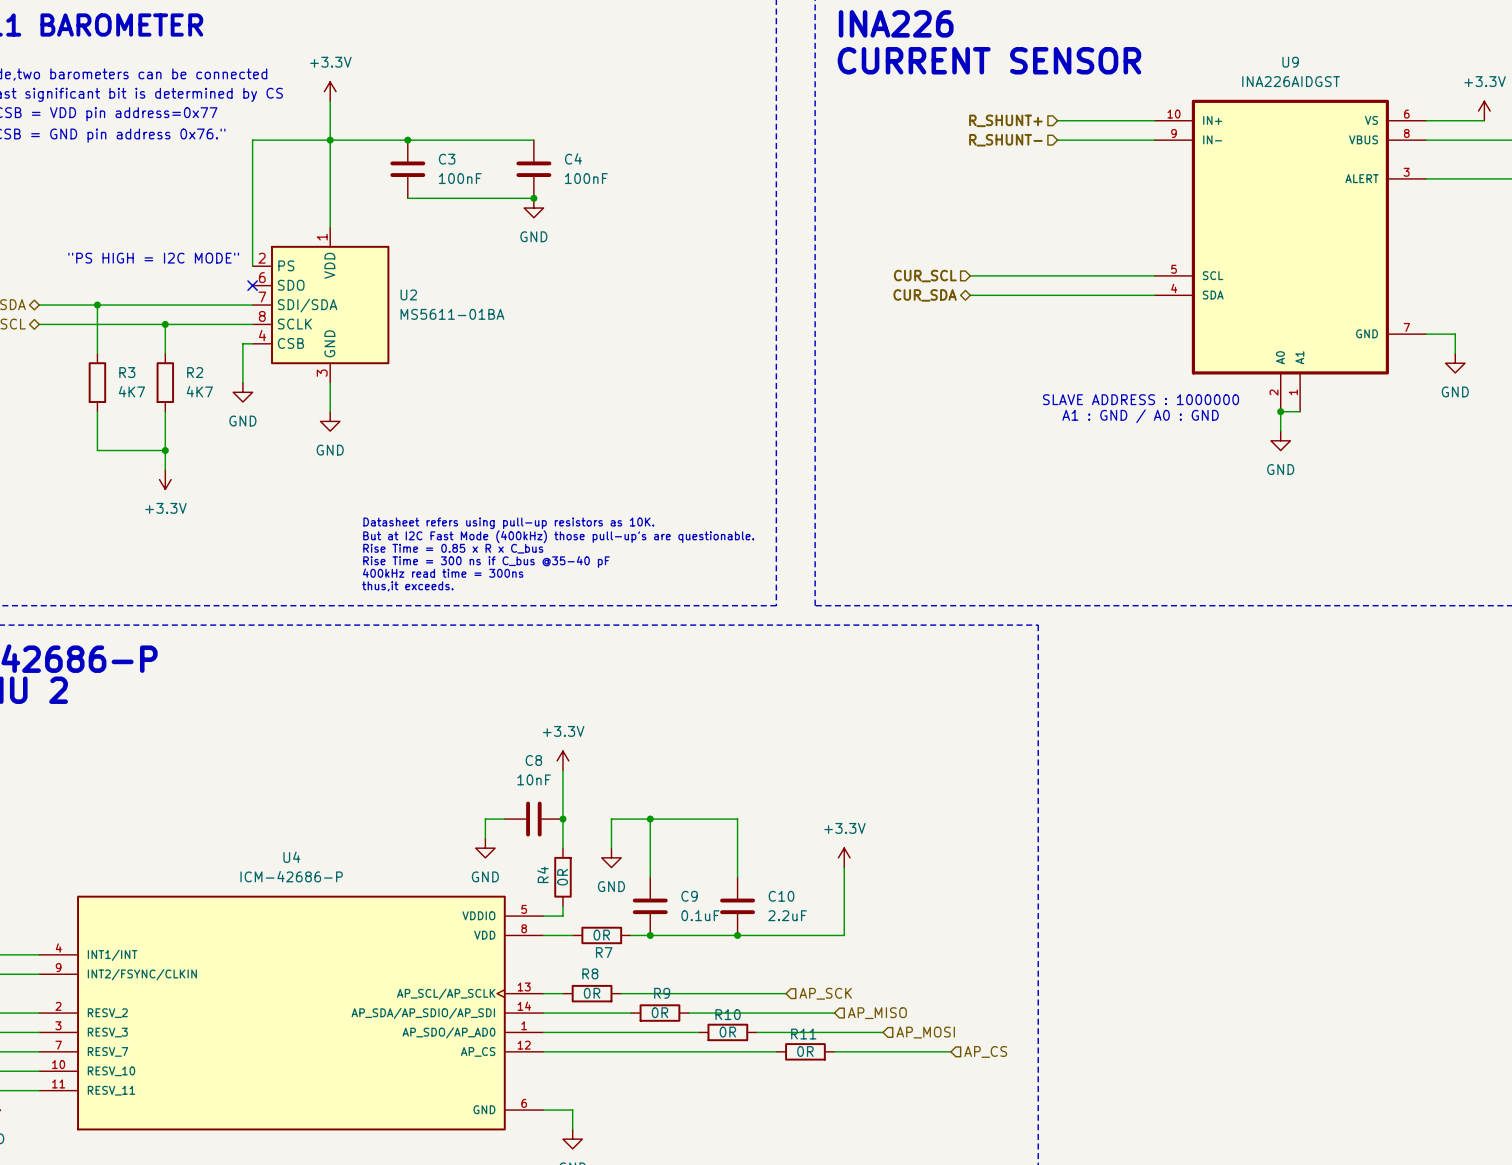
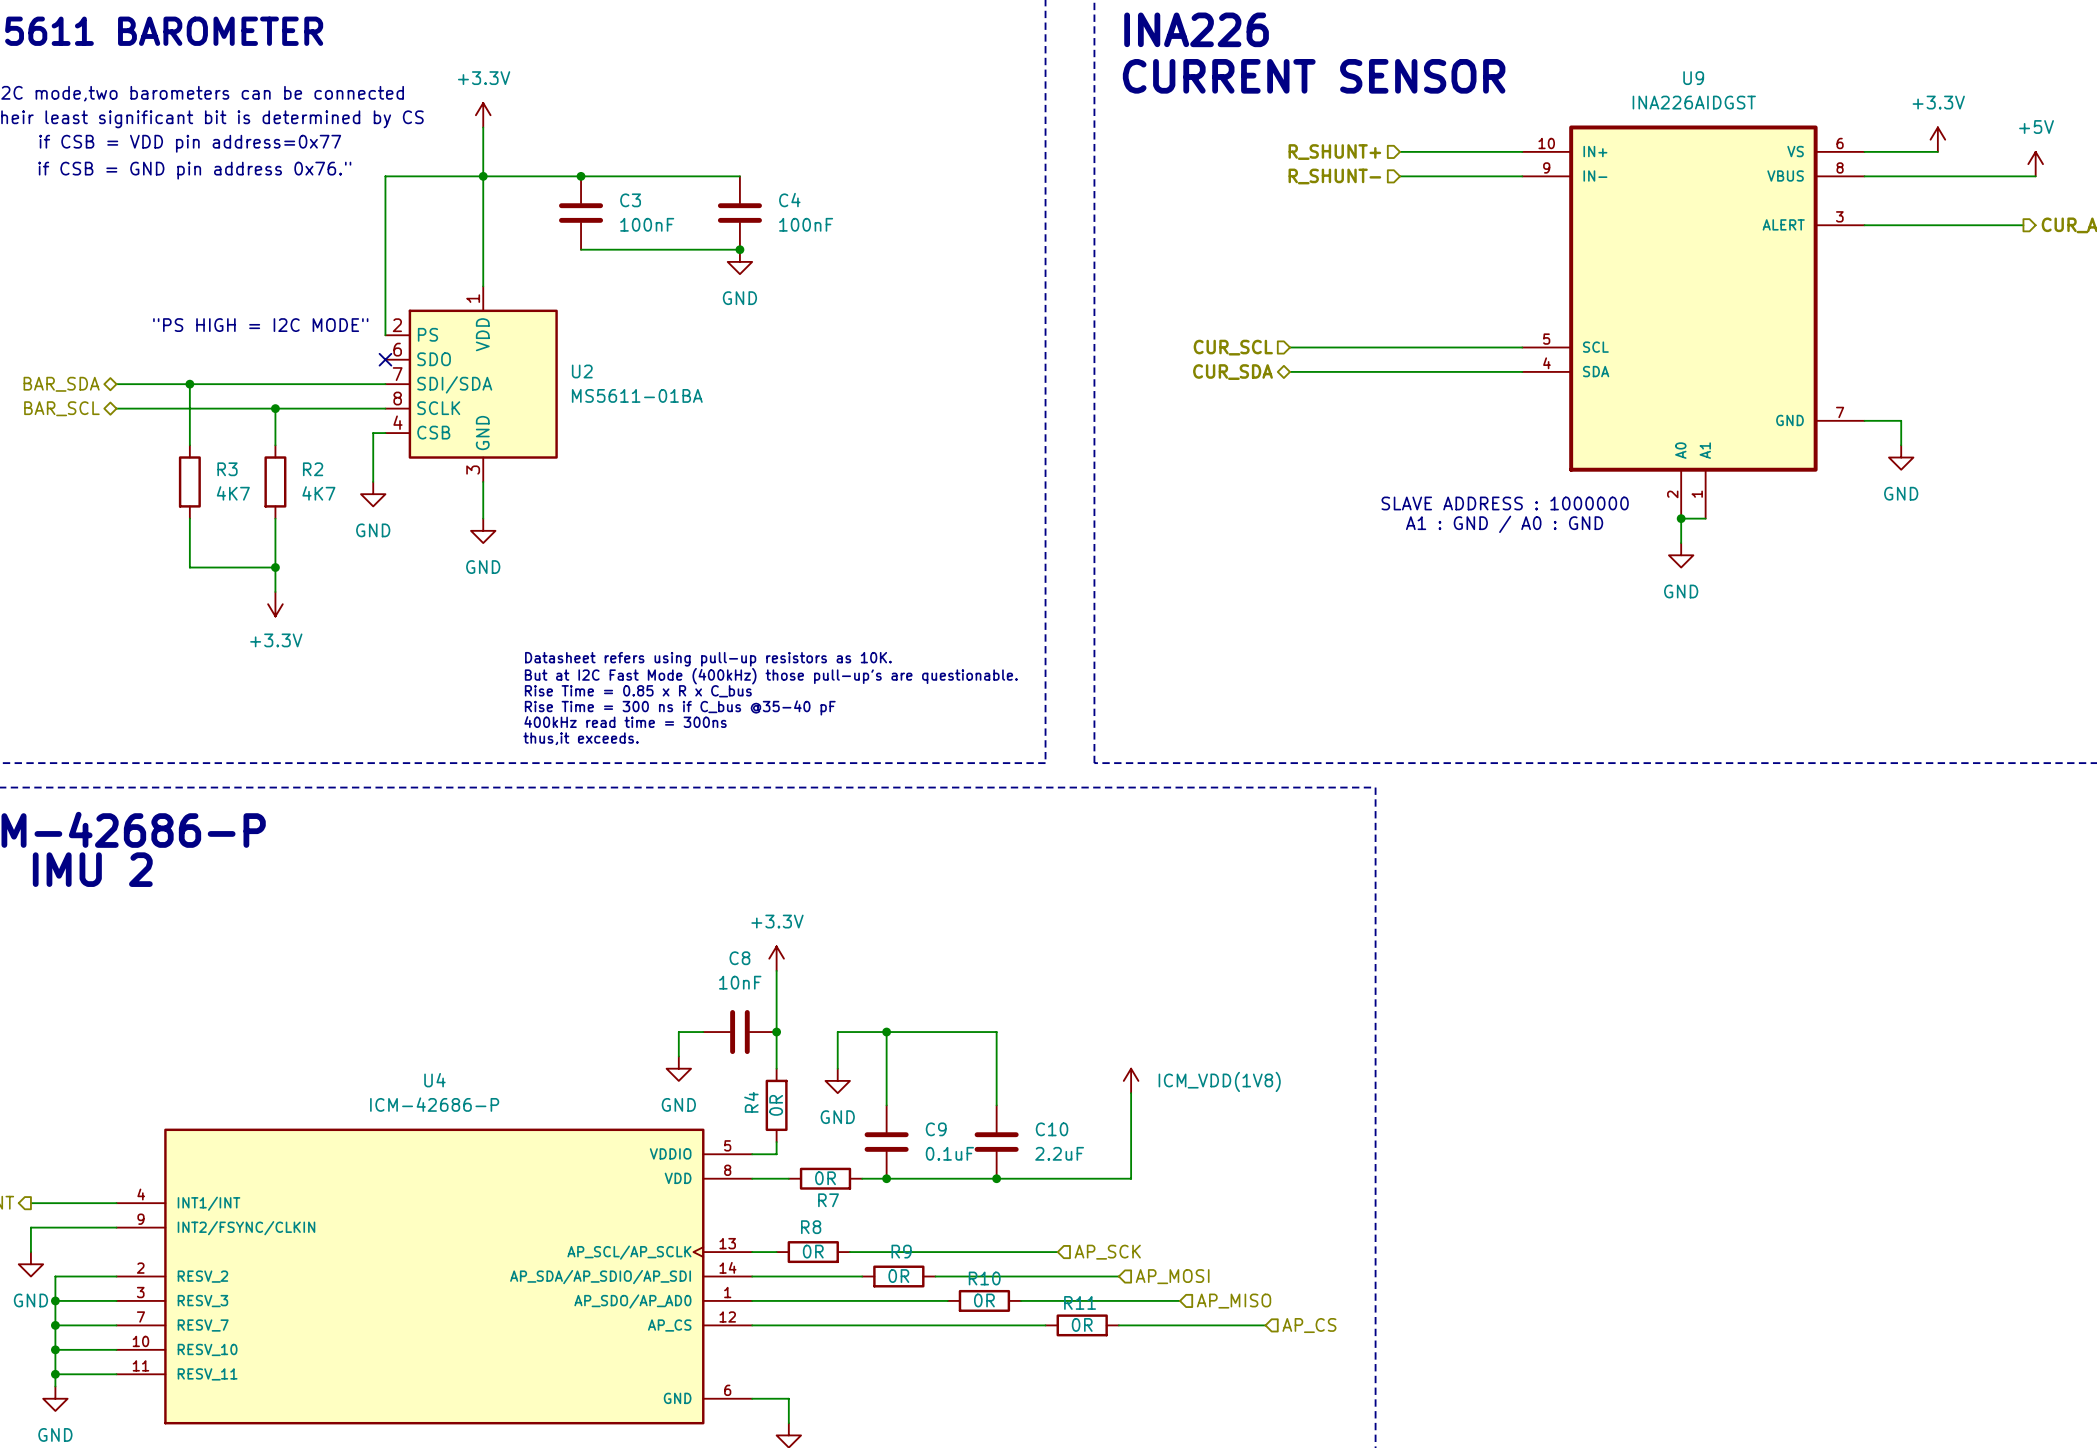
power symbol: +3.3V (844, 857) -> ICM_VDD(1V8) (1131, 1080)
hierarchical label: AP_MISO (877, 1013) -> AP_MOSI (1172, 1276)
hierarchical label: AP_MOSI (925, 1032) -> AP_MISO (1234, 1301)

